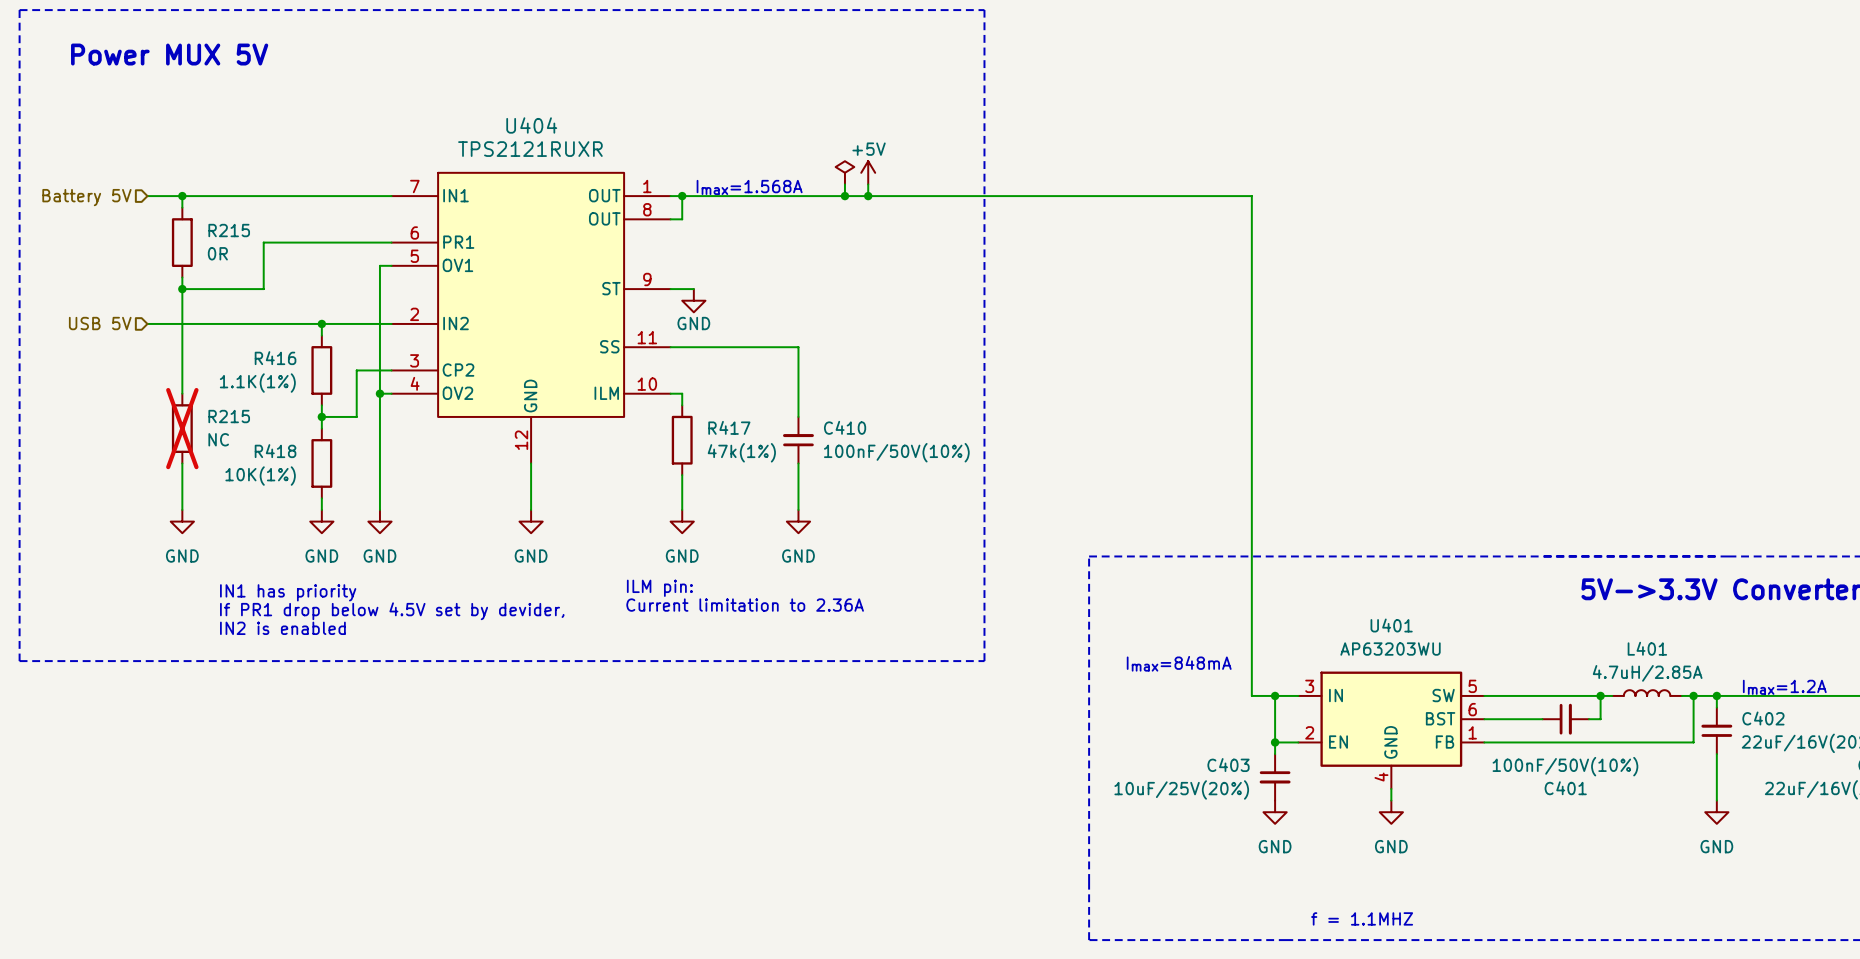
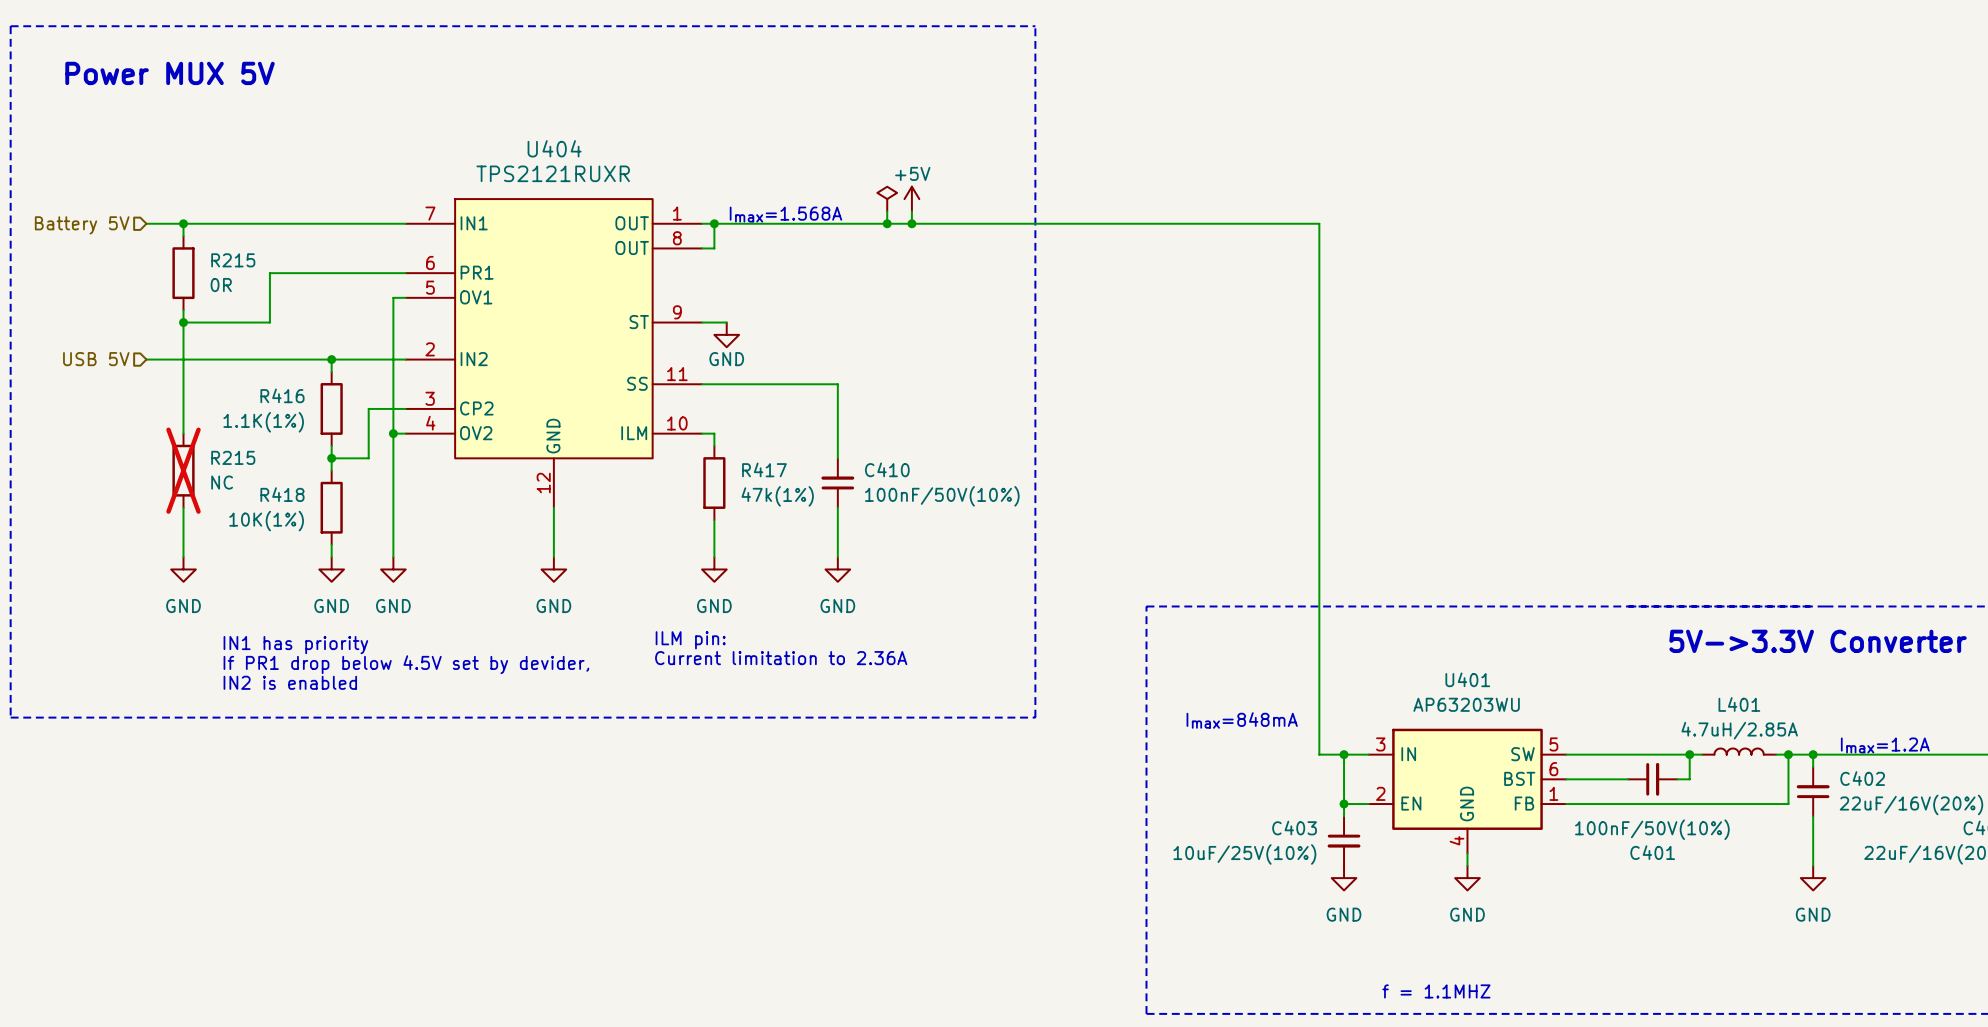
C403 value: 10uF/25V(20%) (1181, 789) -> 10uF/25V(10%) (1244, 854)

